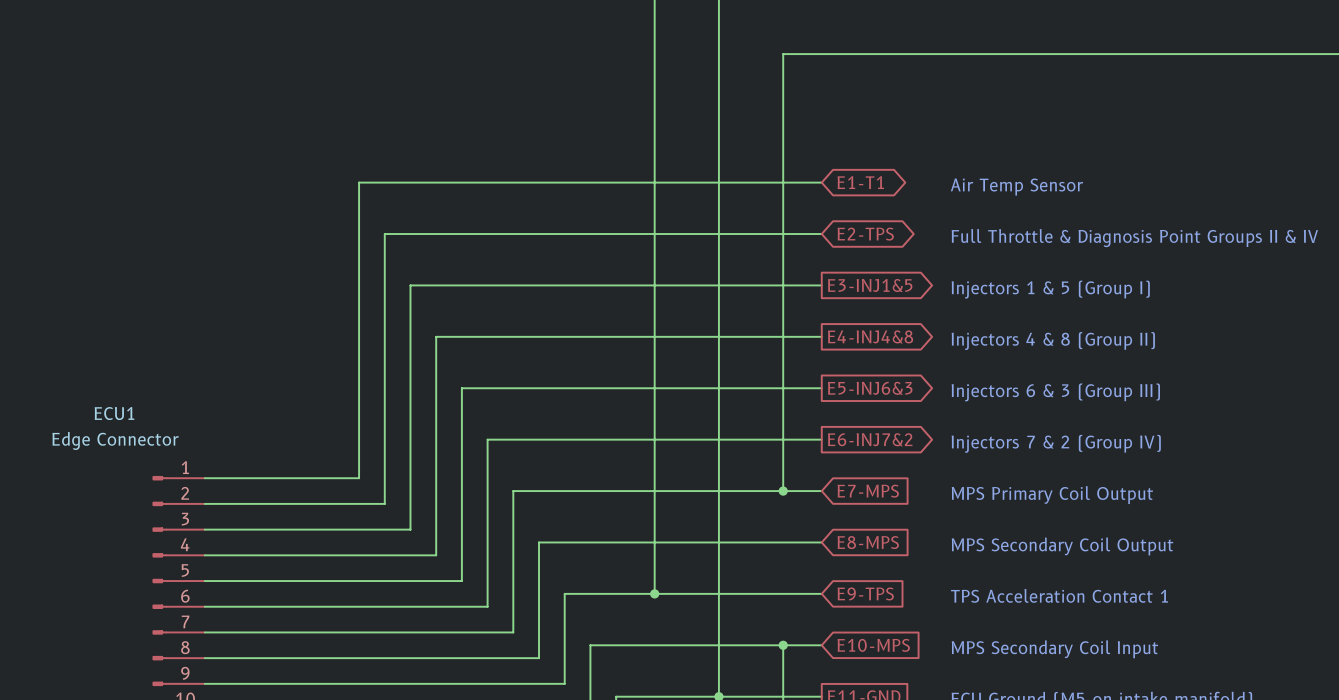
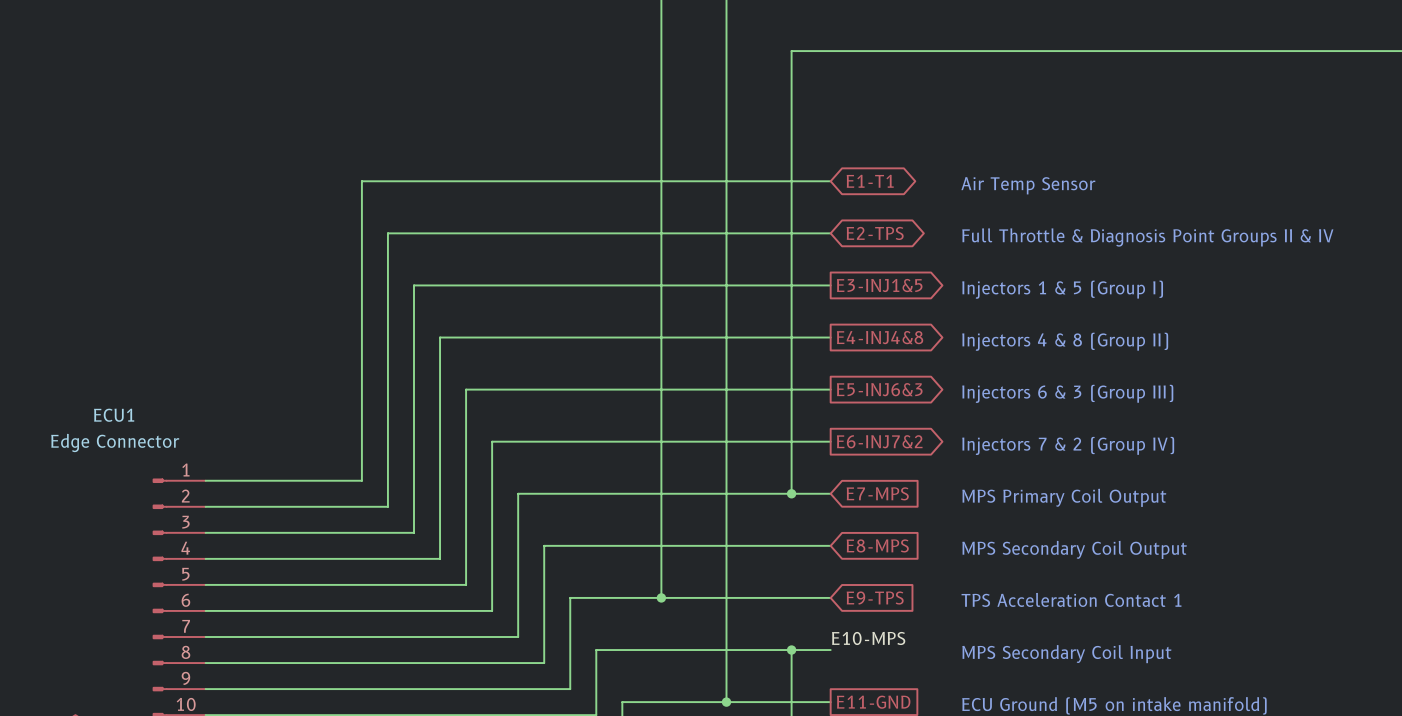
label: none -> E10-MPS (868, 638)
global label: E10-MPS (873, 645) -> none

